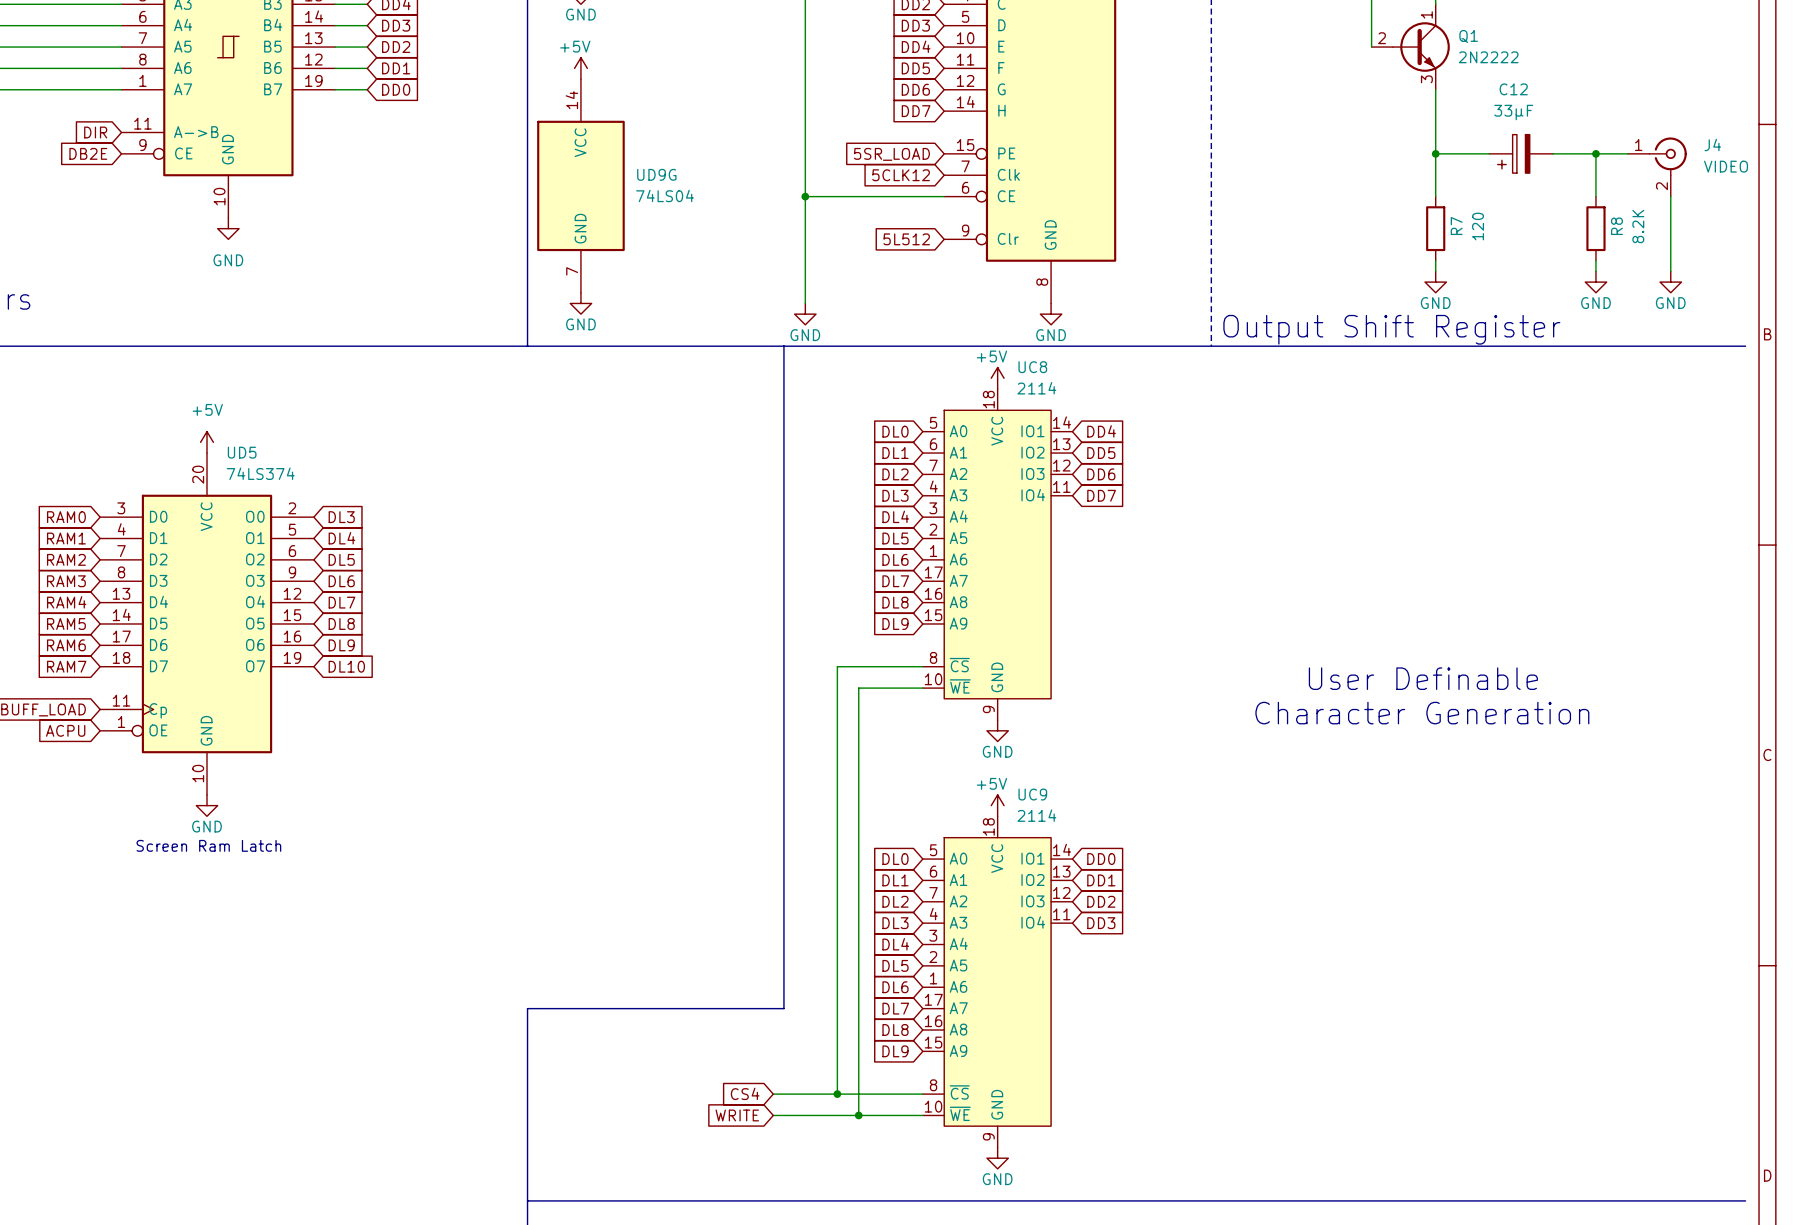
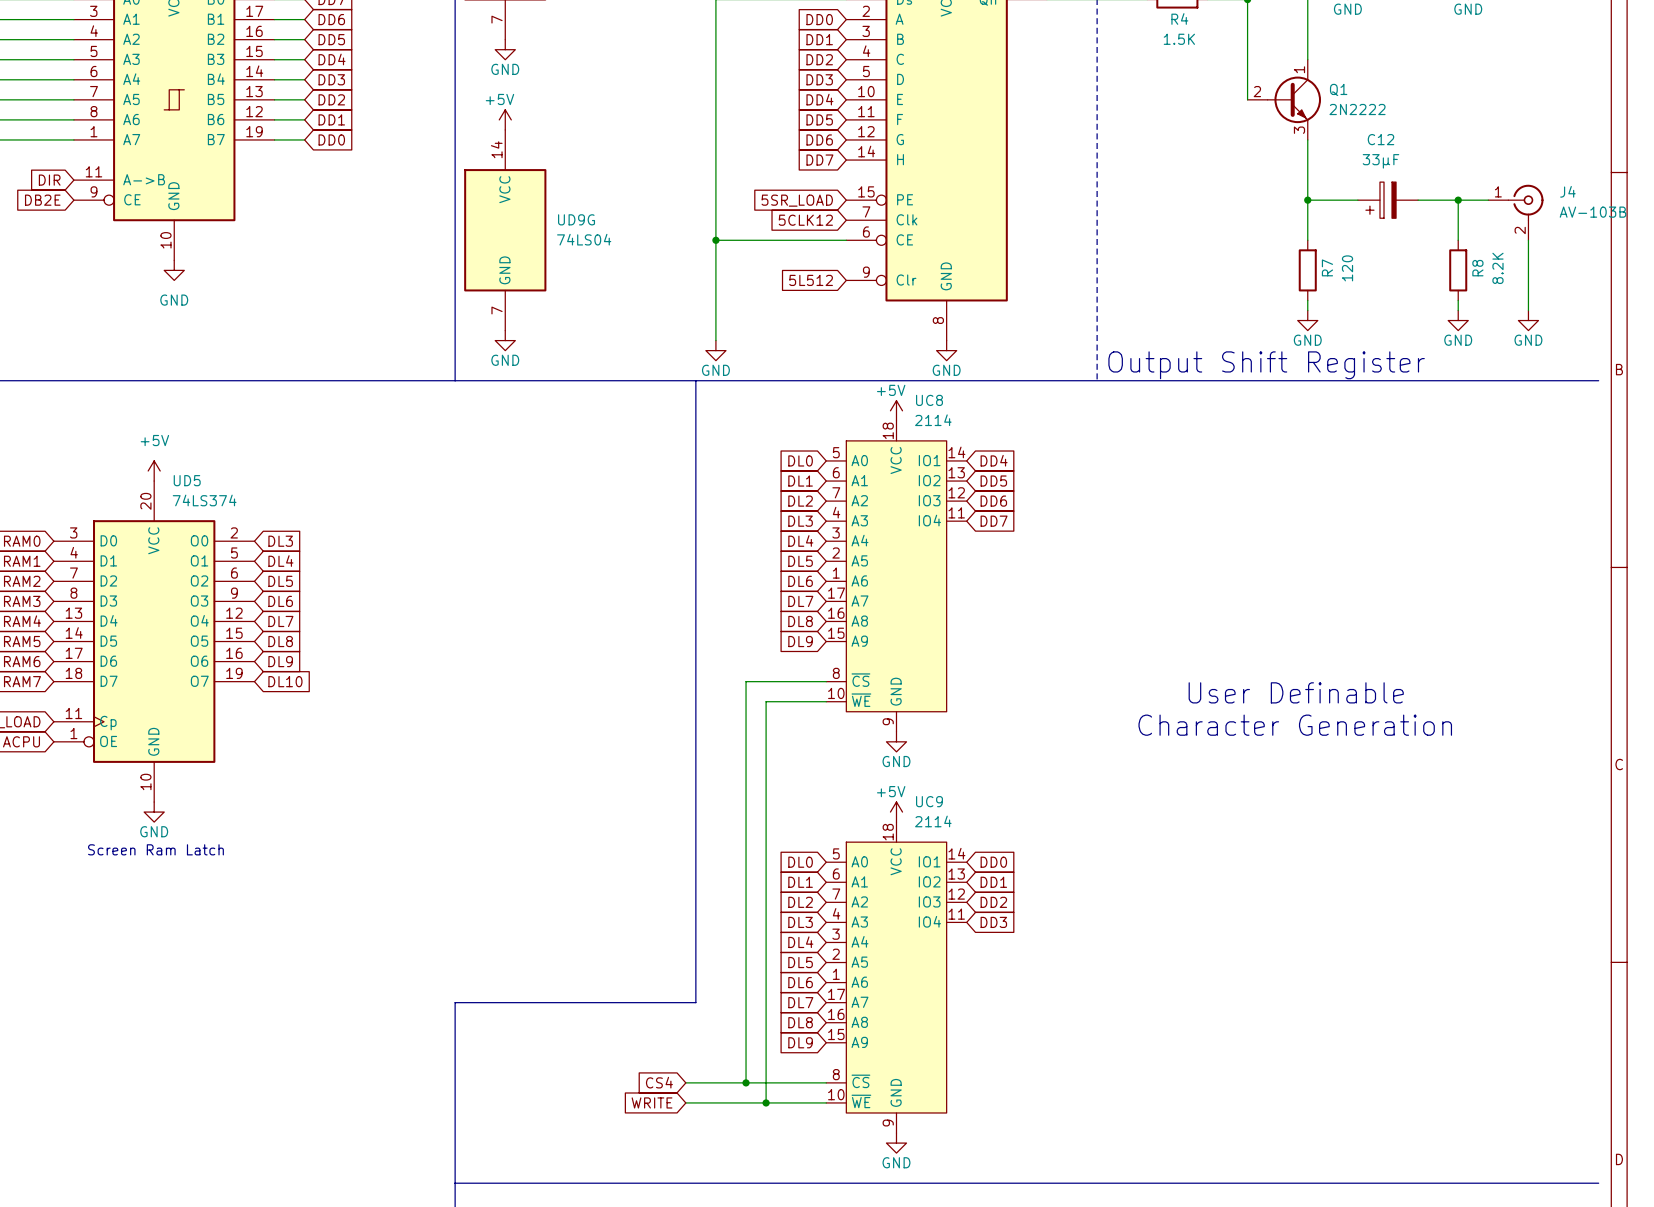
J4 value: VIDEO (1726, 166) -> AV-103B (1593, 212)

